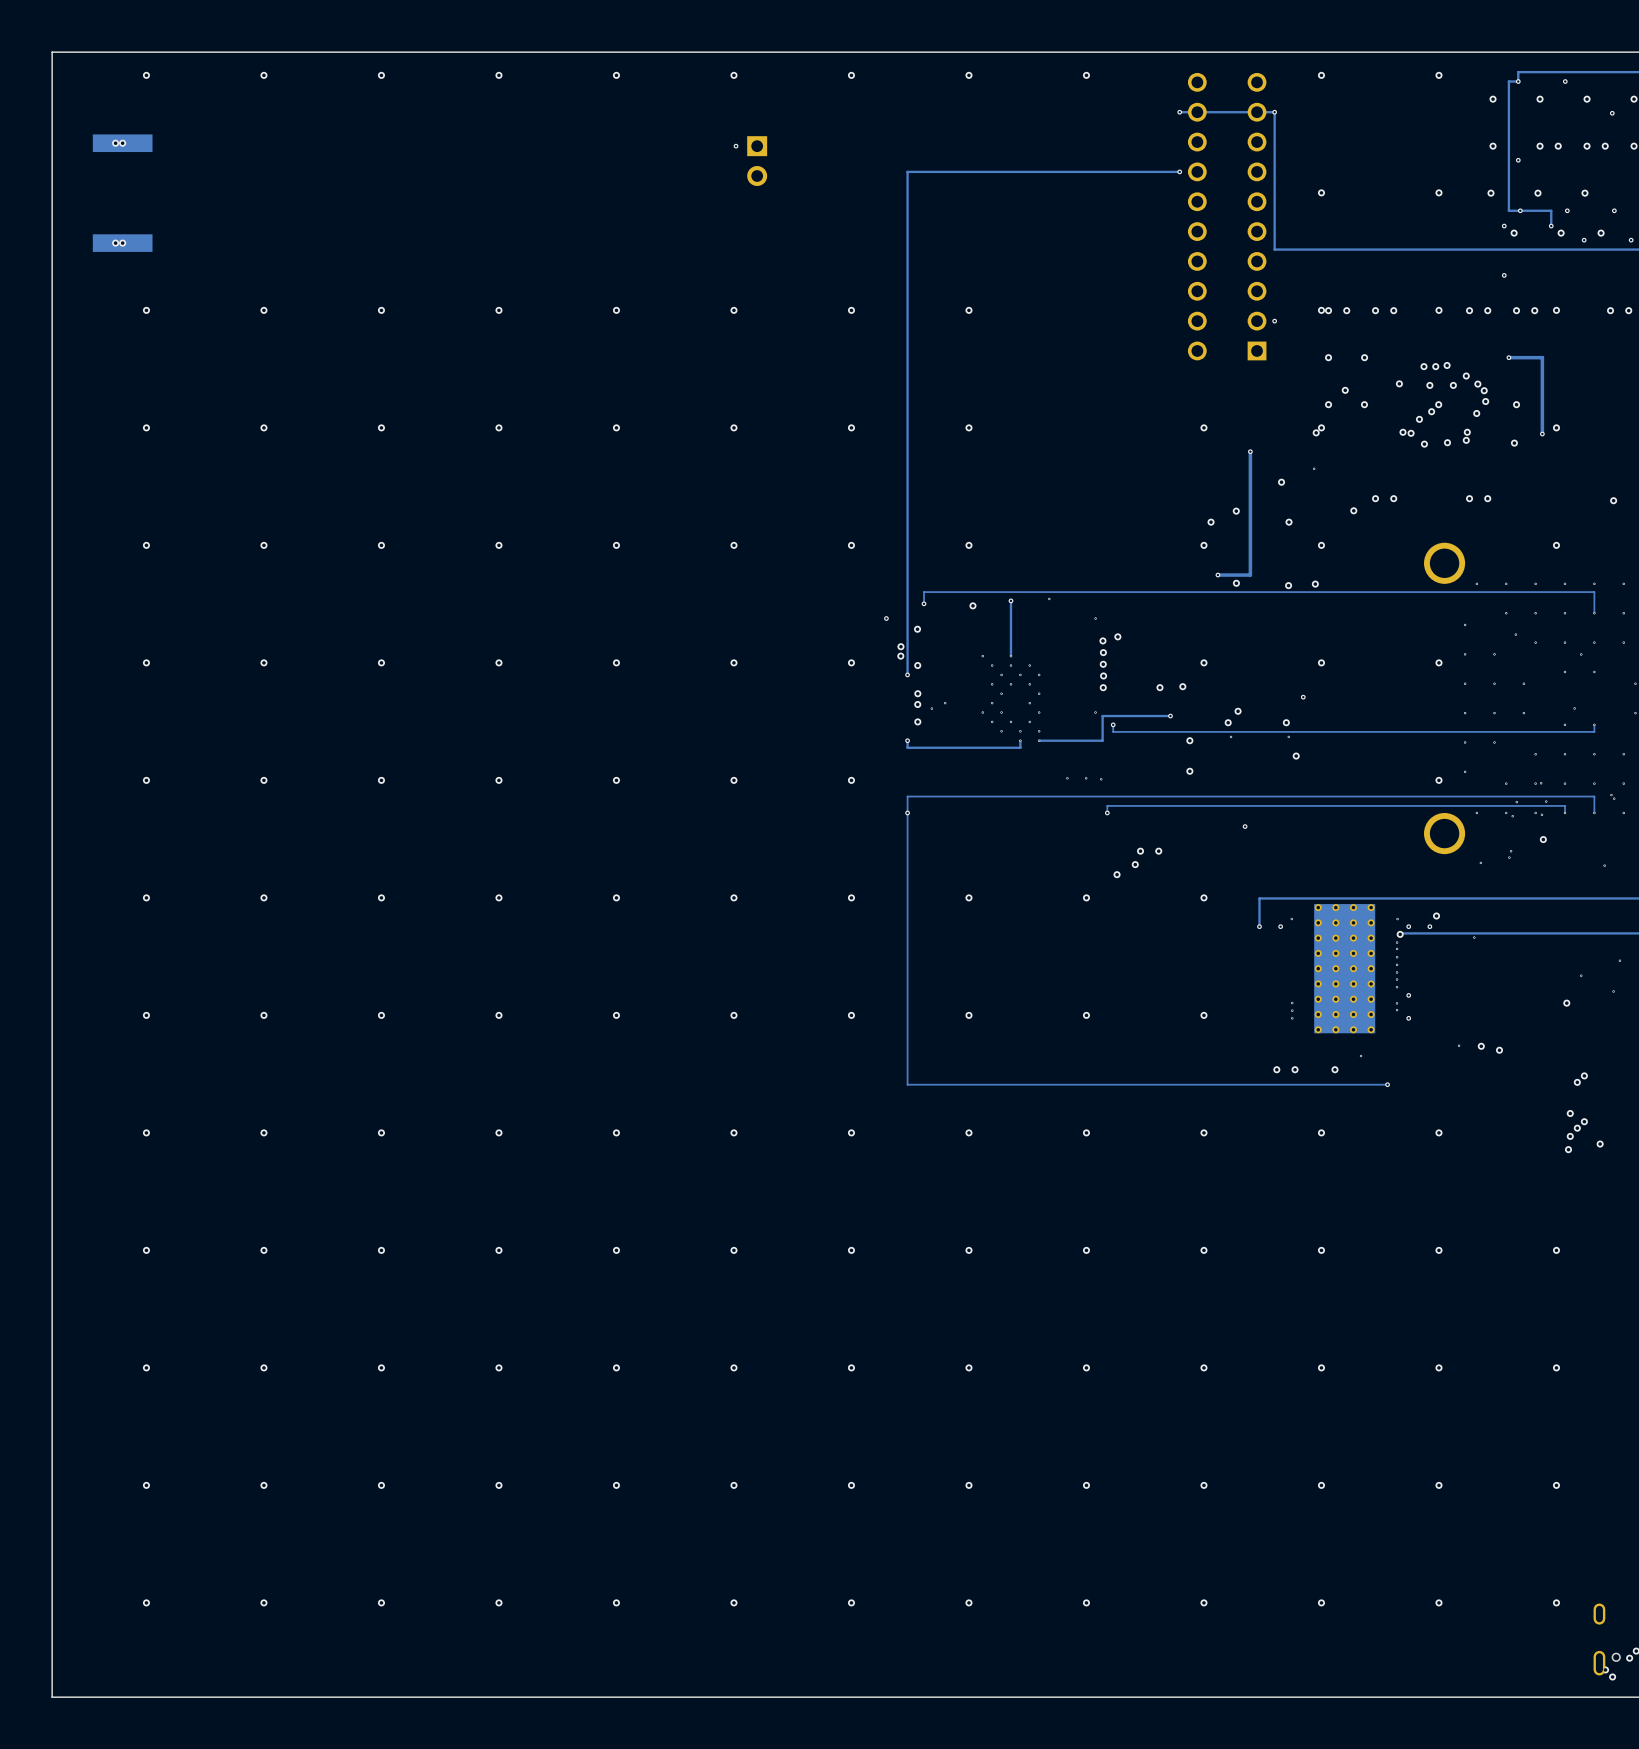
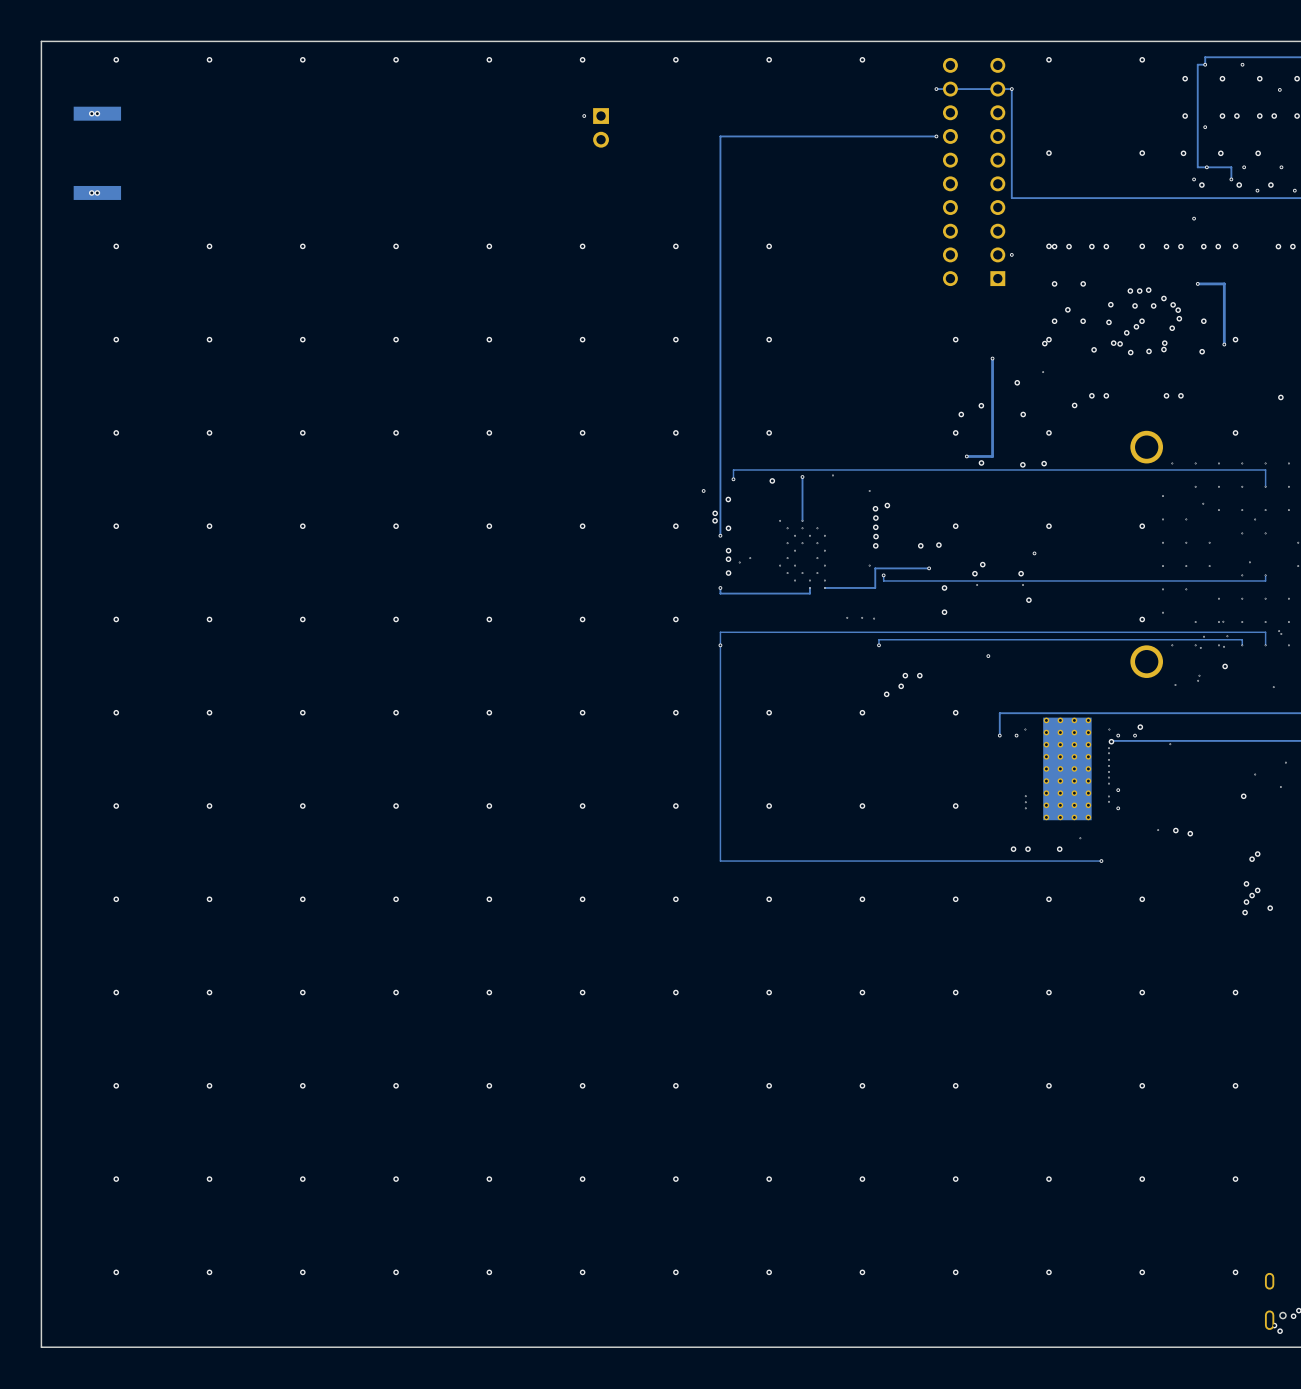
via: none -> (1108, 322)
via: none -> (1094, 349)

